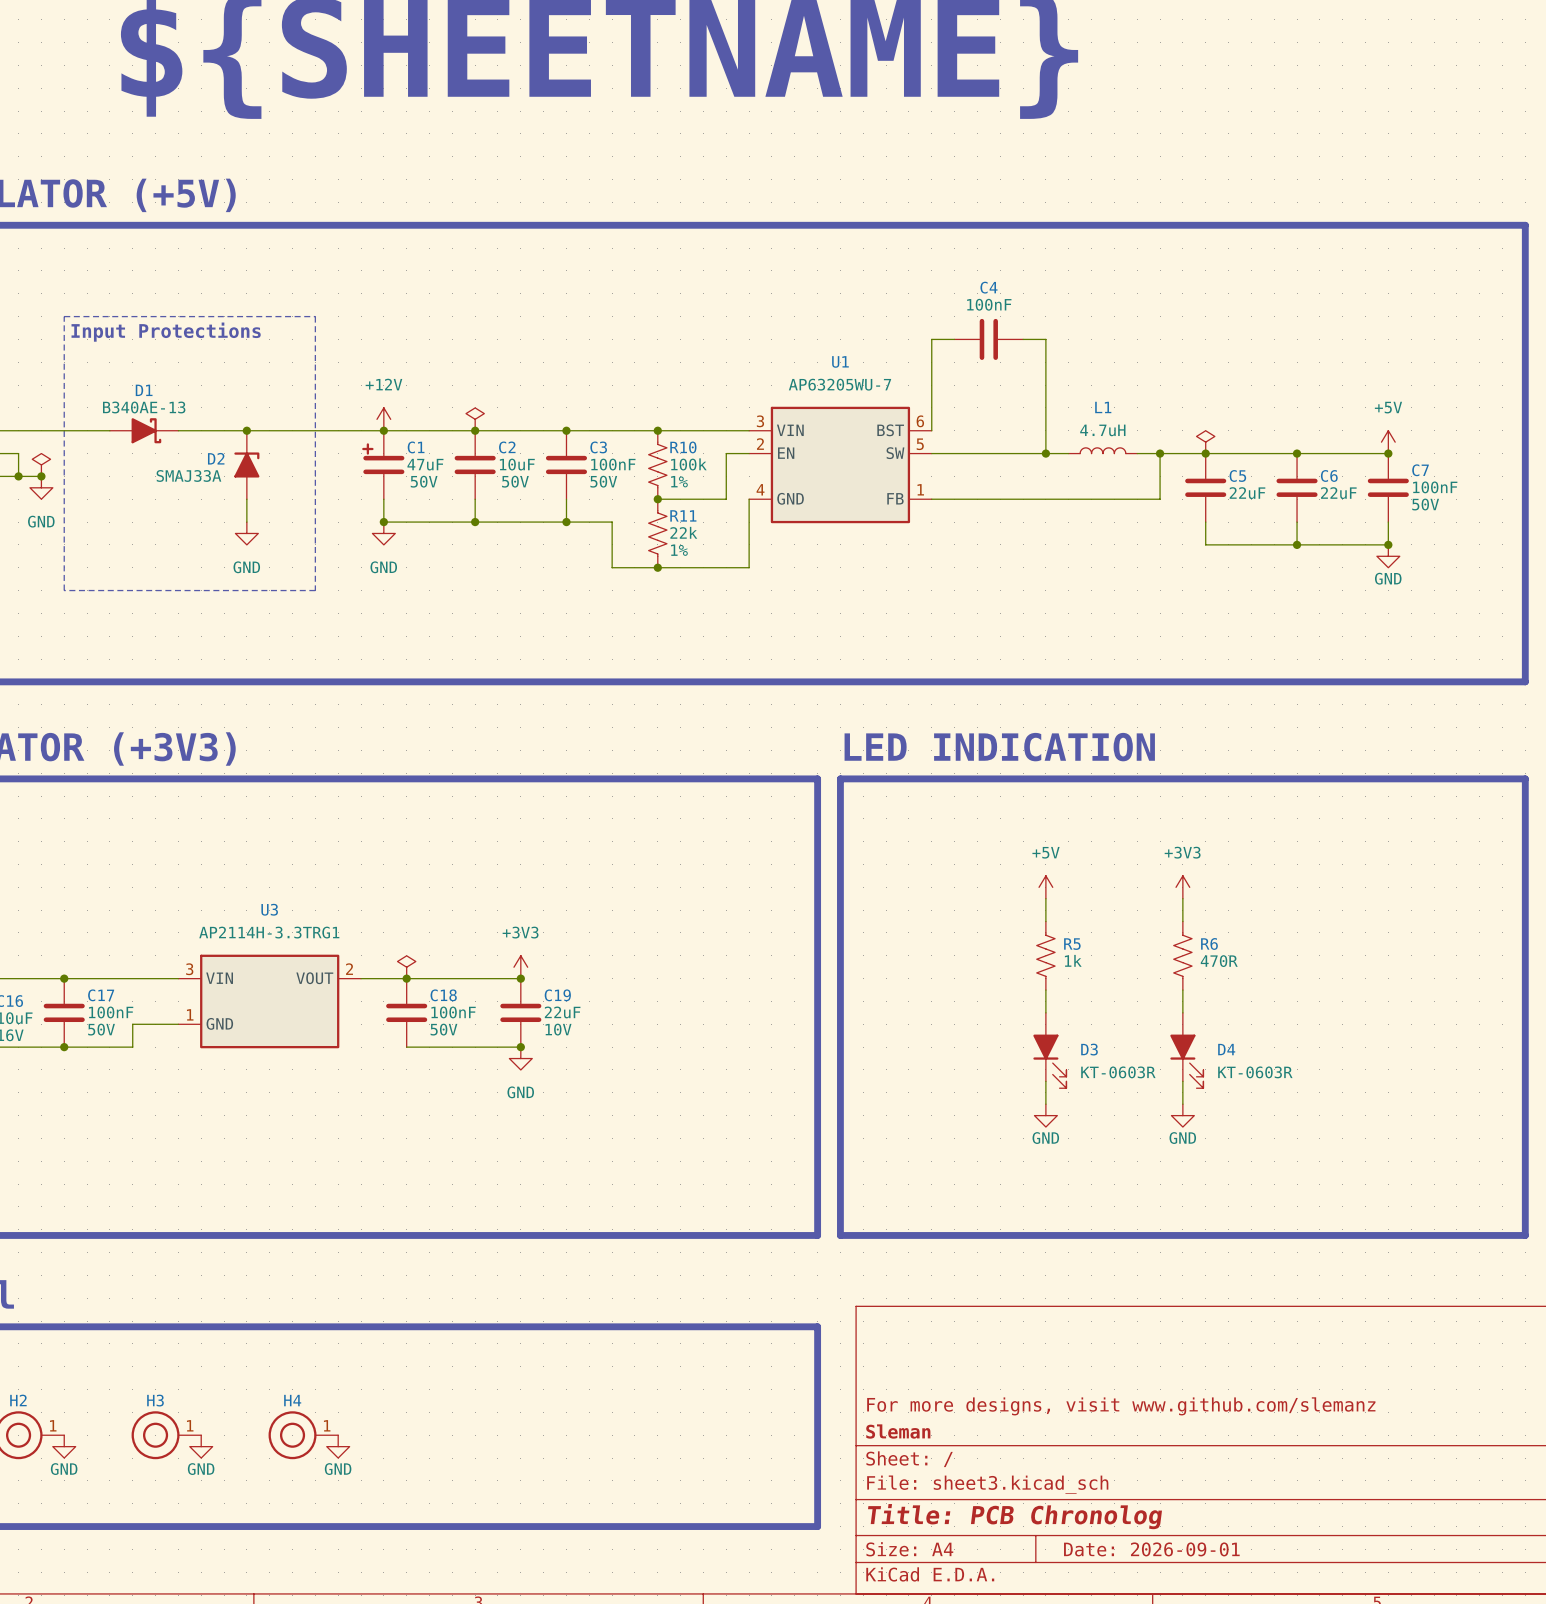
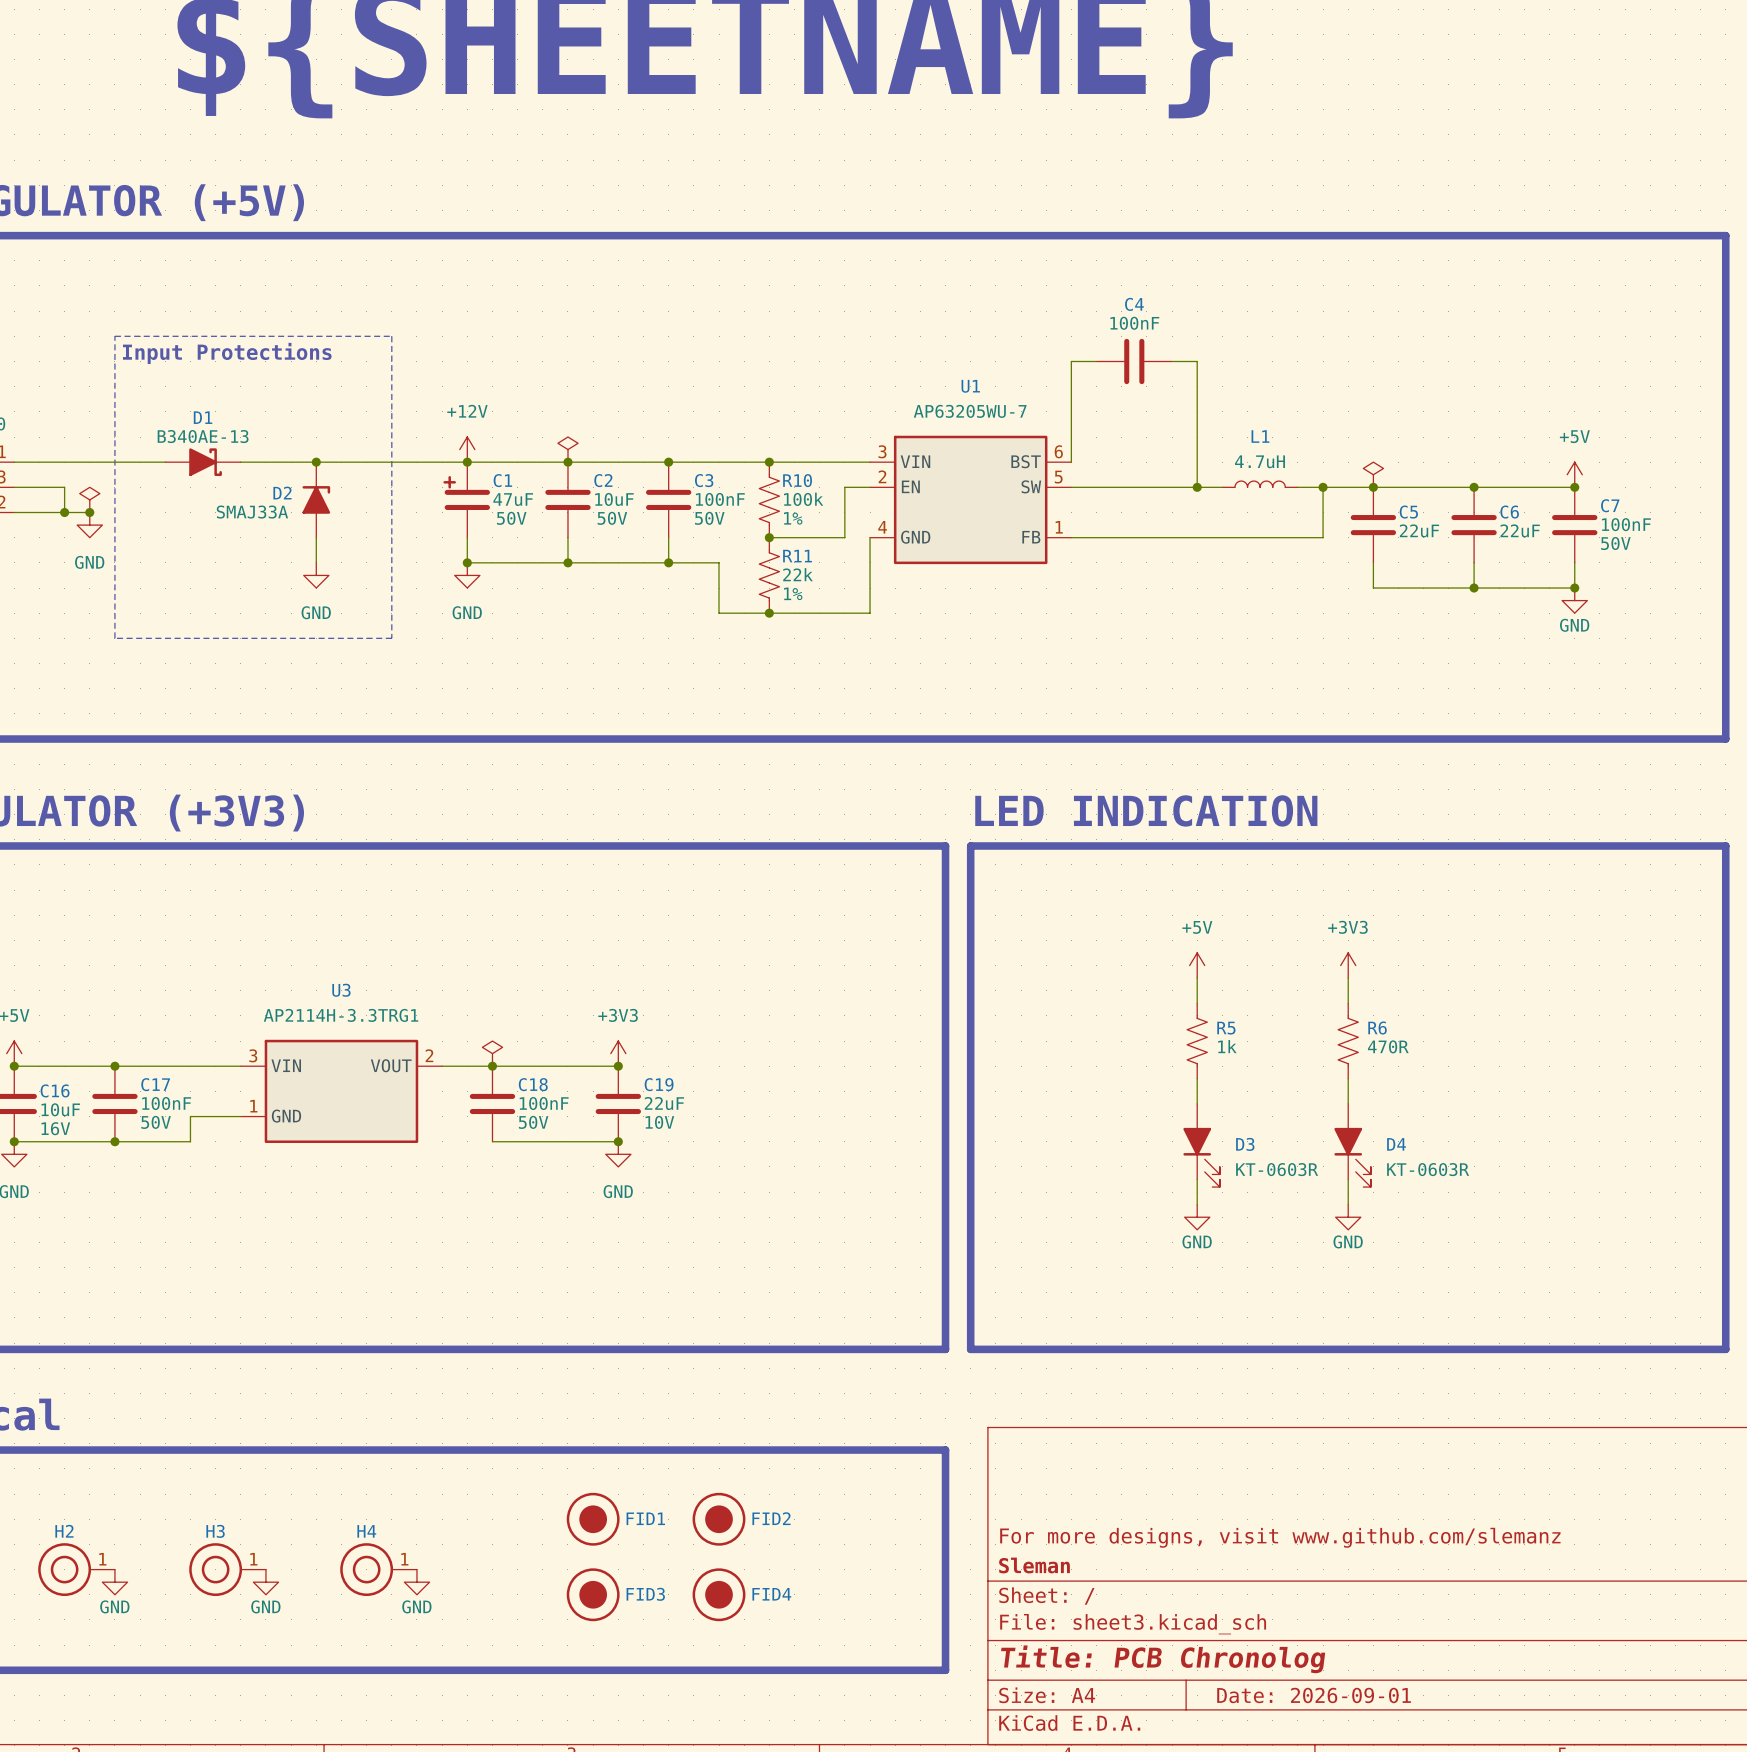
FID1: none -> (593, 1519)
FID2: none -> (719, 1519)
FID3: none -> (593, 1594)
FID4: none -> (719, 1594)

